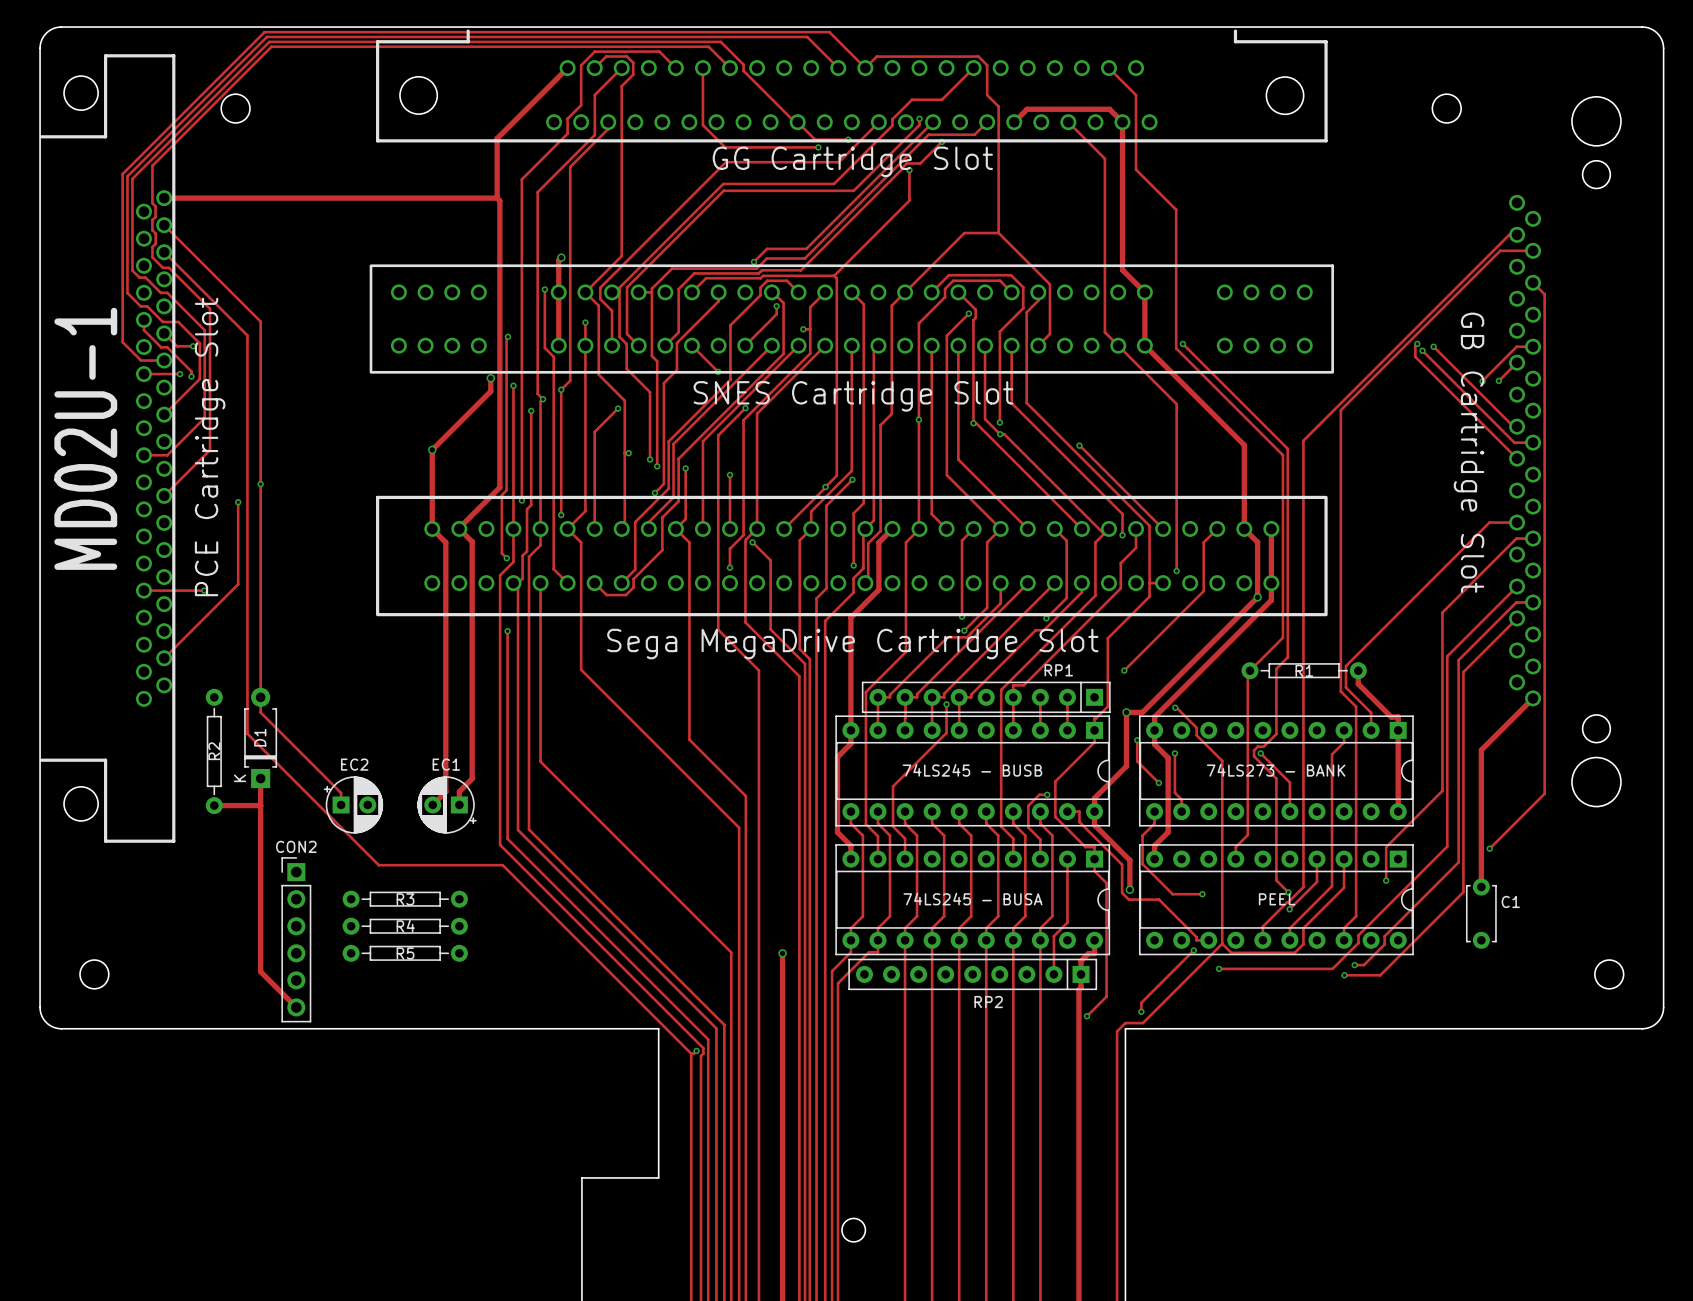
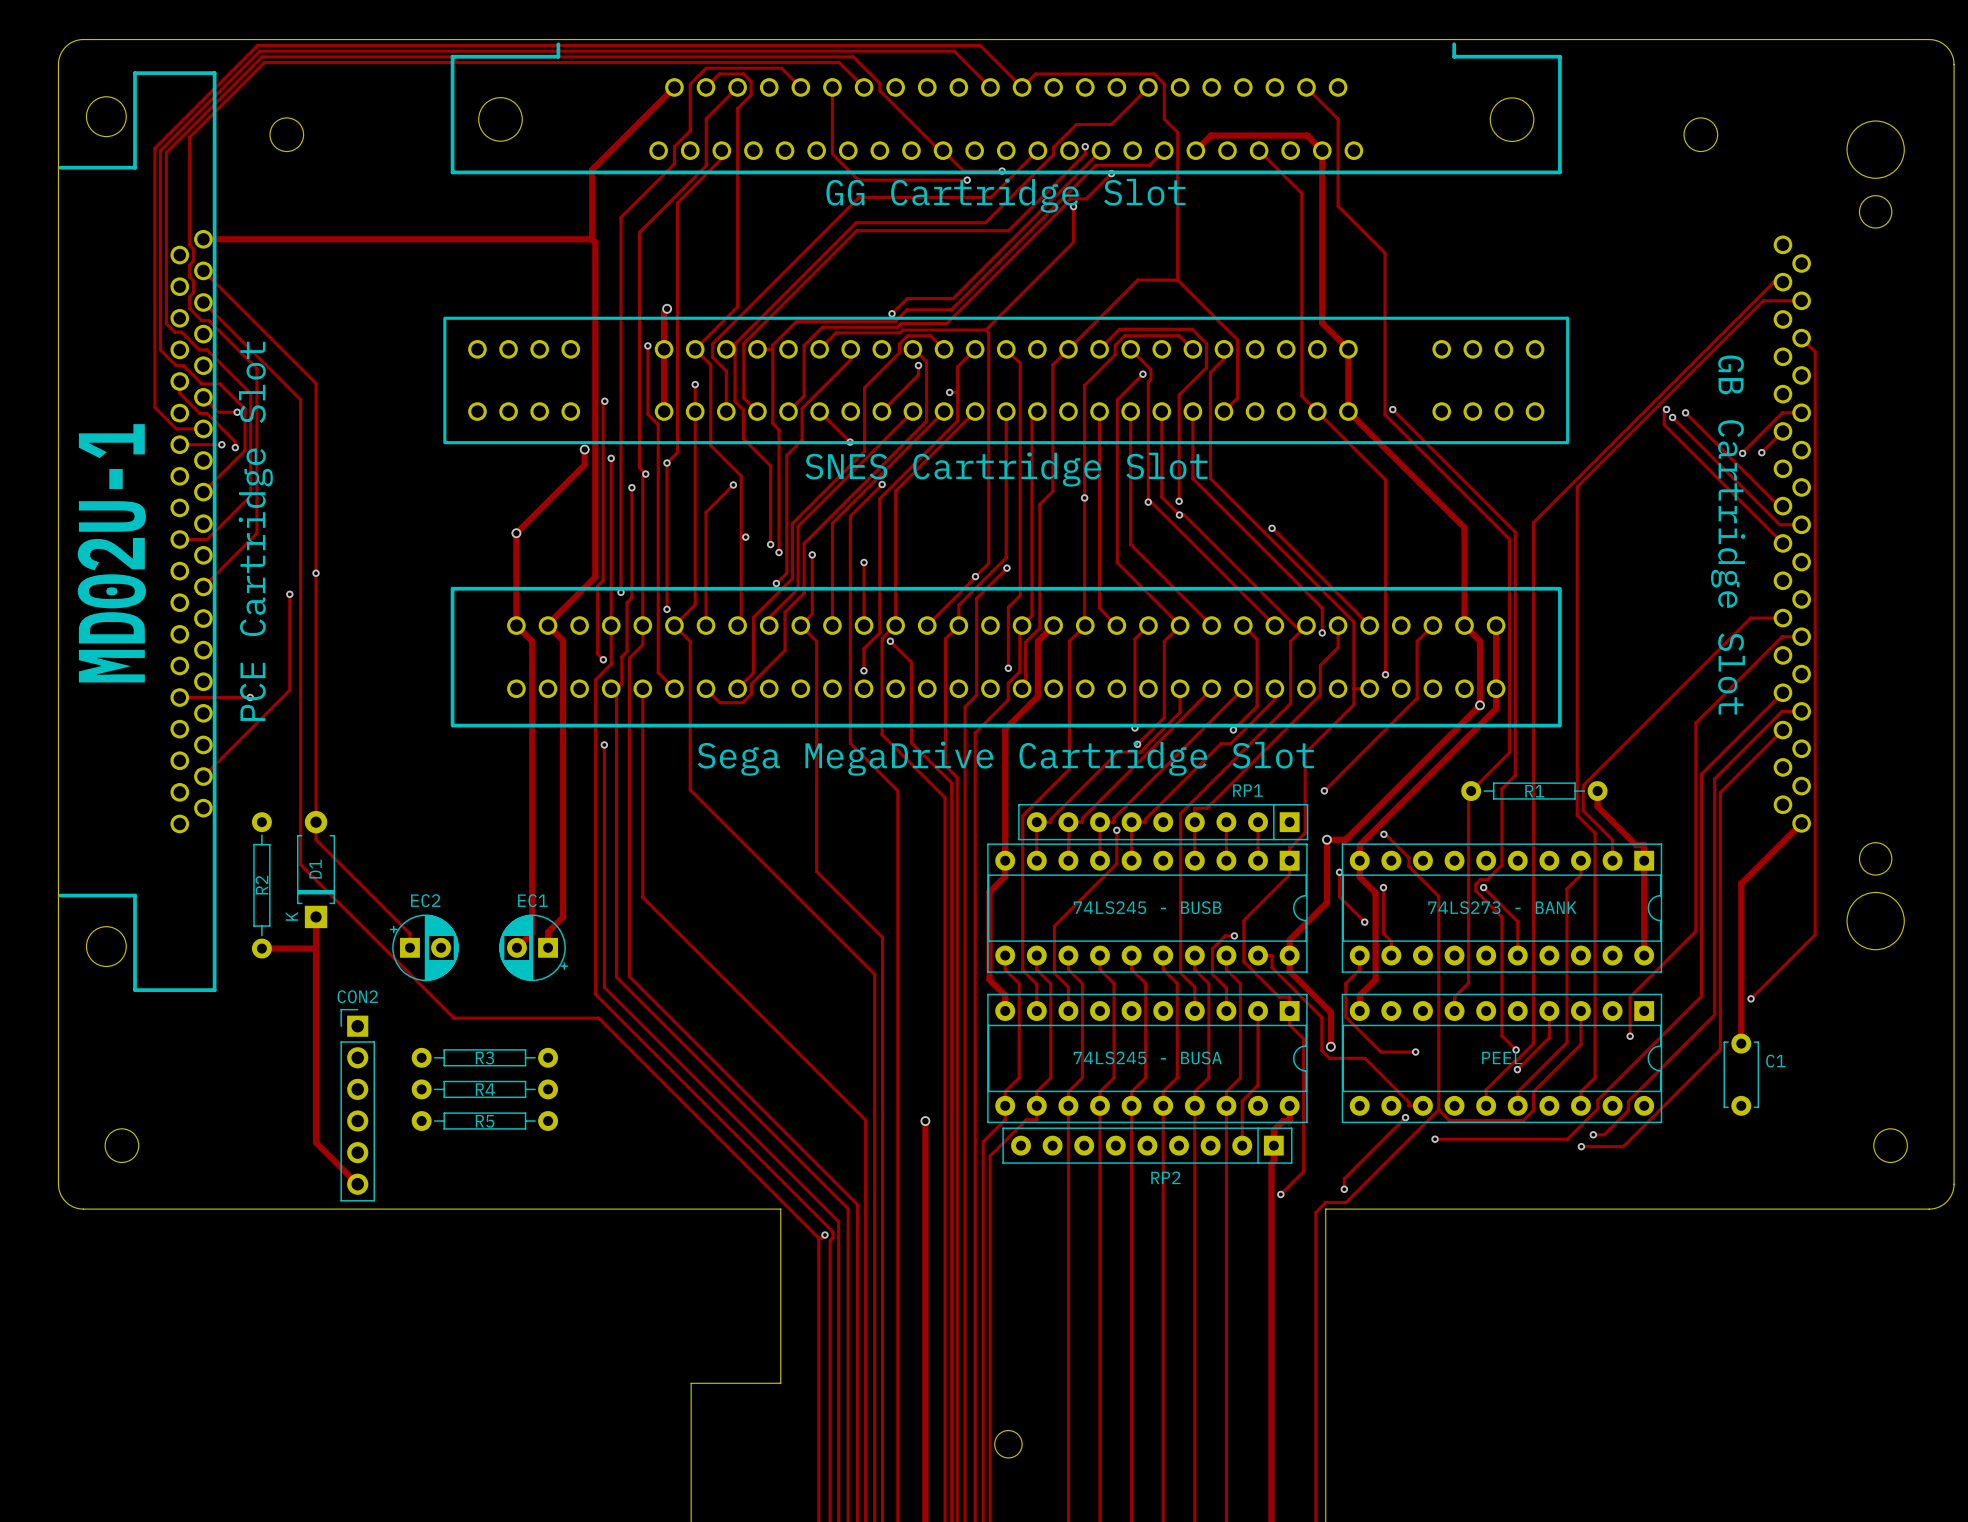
track: (264, 32) (122, 174) -> (320, 45) (257, 45) (154, 148) (154, 211)
track: (266, 36) (127, 176) -> (323, 51) (259, 51) (160, 150) (160, 213)
track: (269, 41) (132, 178) -> (326, 56) (262, 56) (166, 152) (166, 216)
track: (271, 46) (152, 165) -> (328, 62) (264, 62) (189, 137) (189, 201)

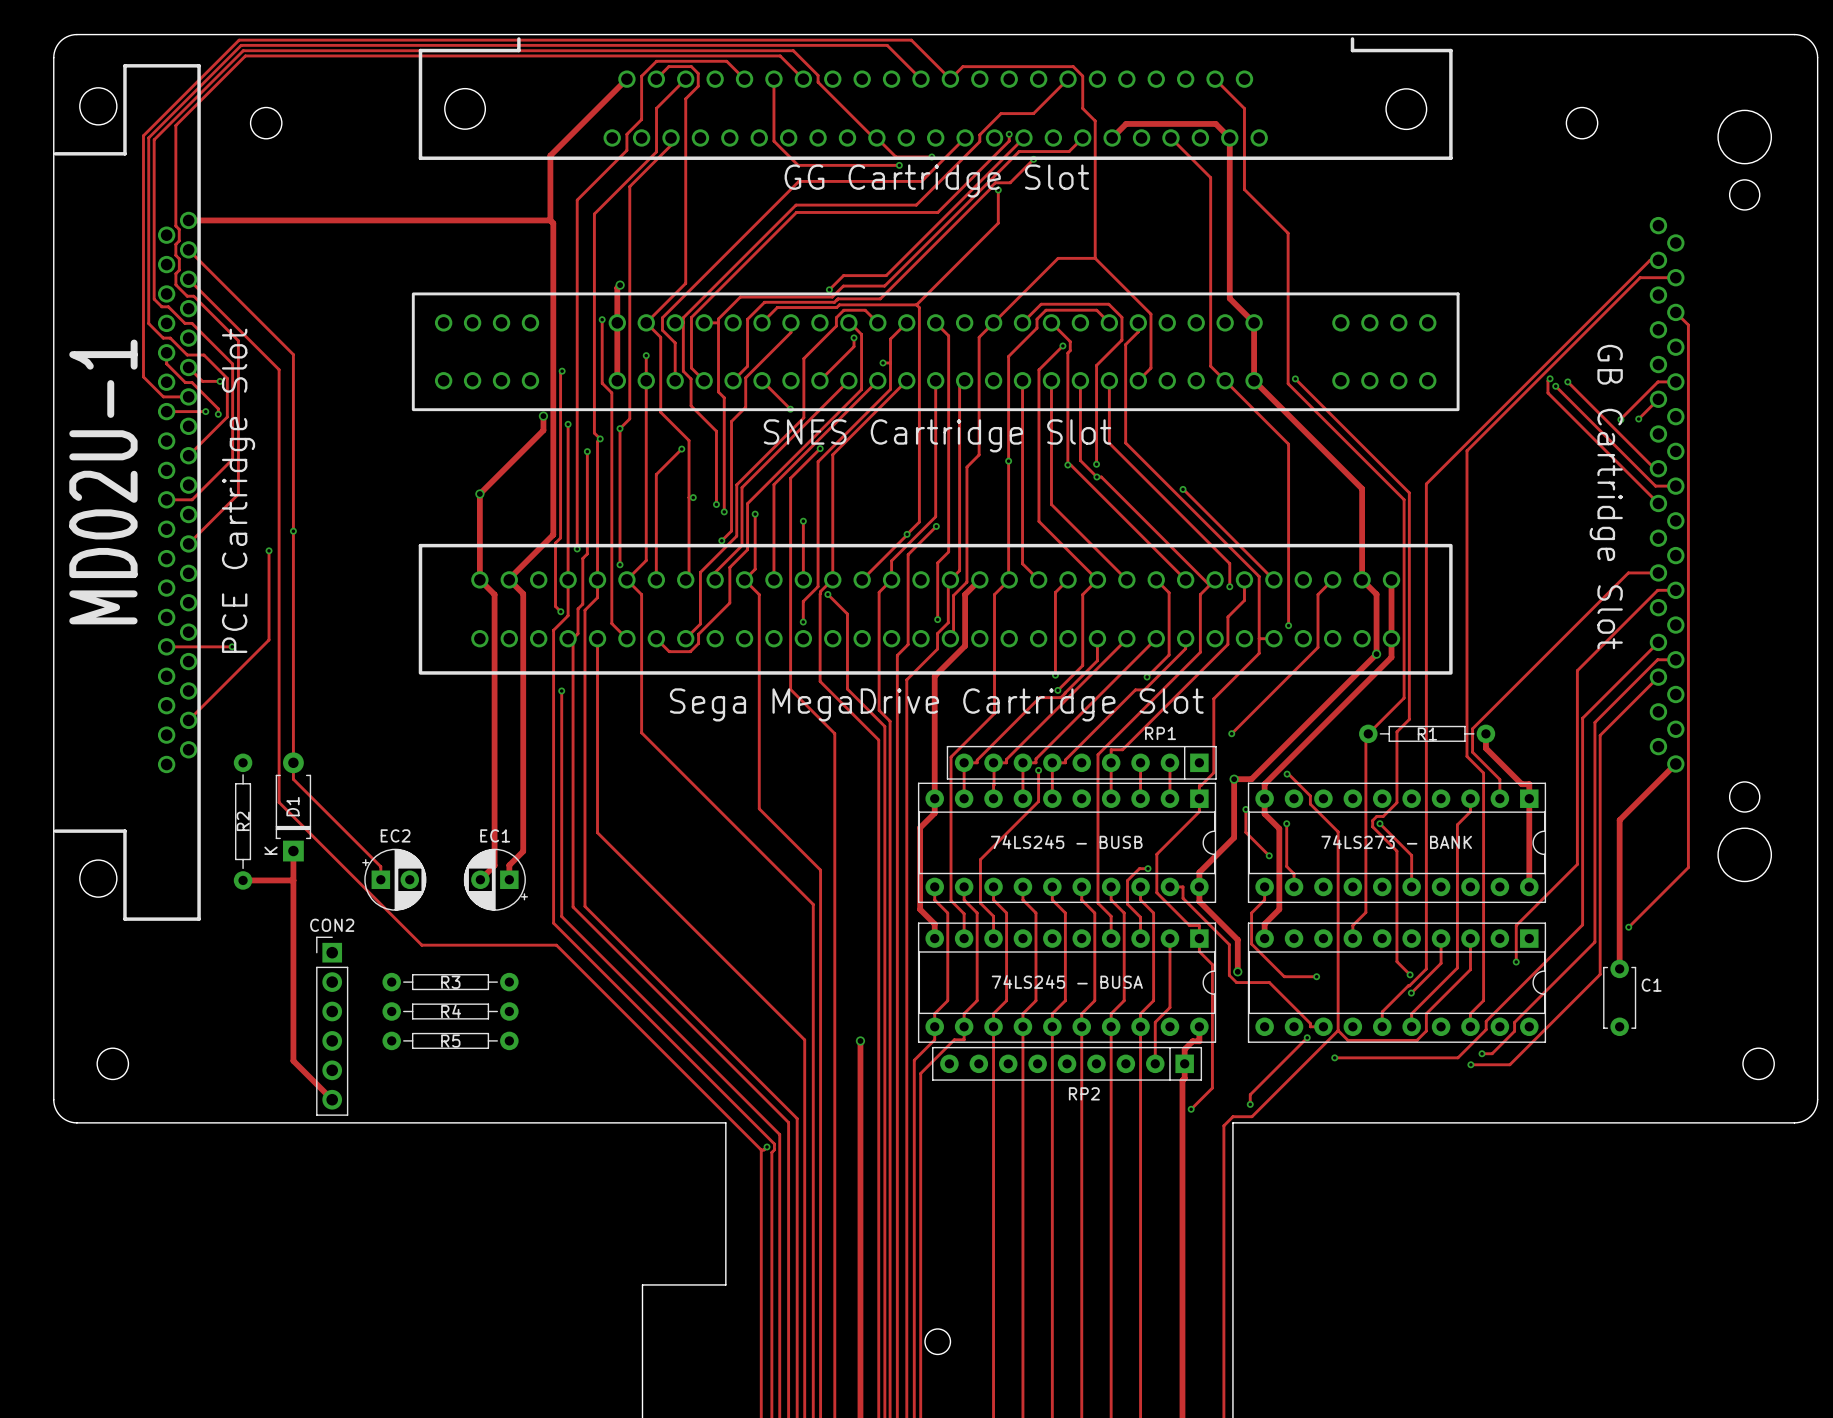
part value: PEEL (1502, 1057) -> none

